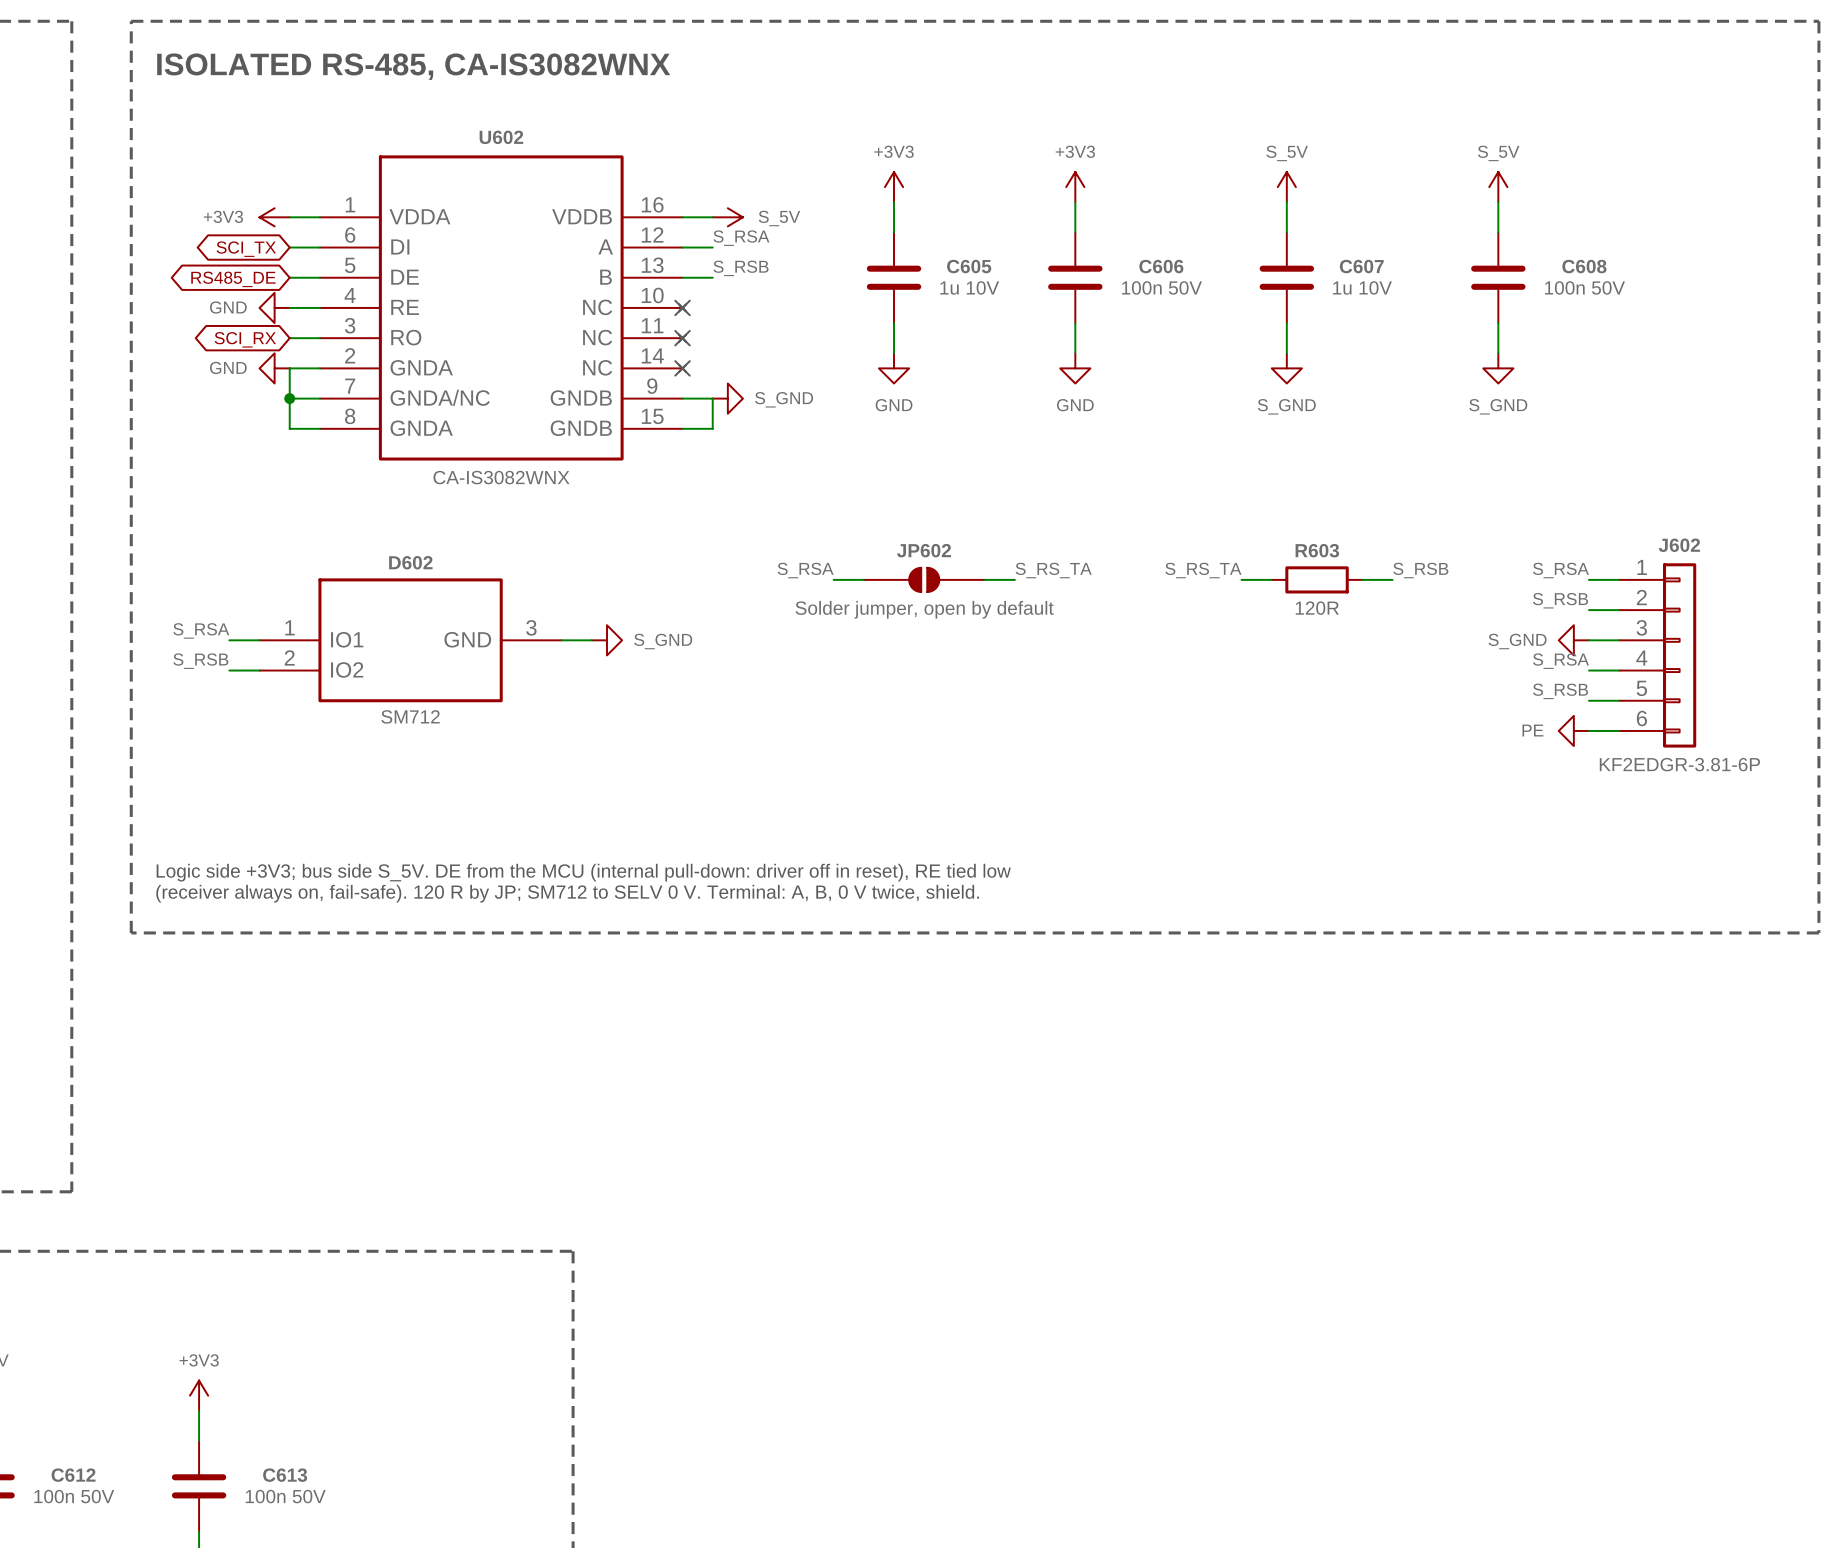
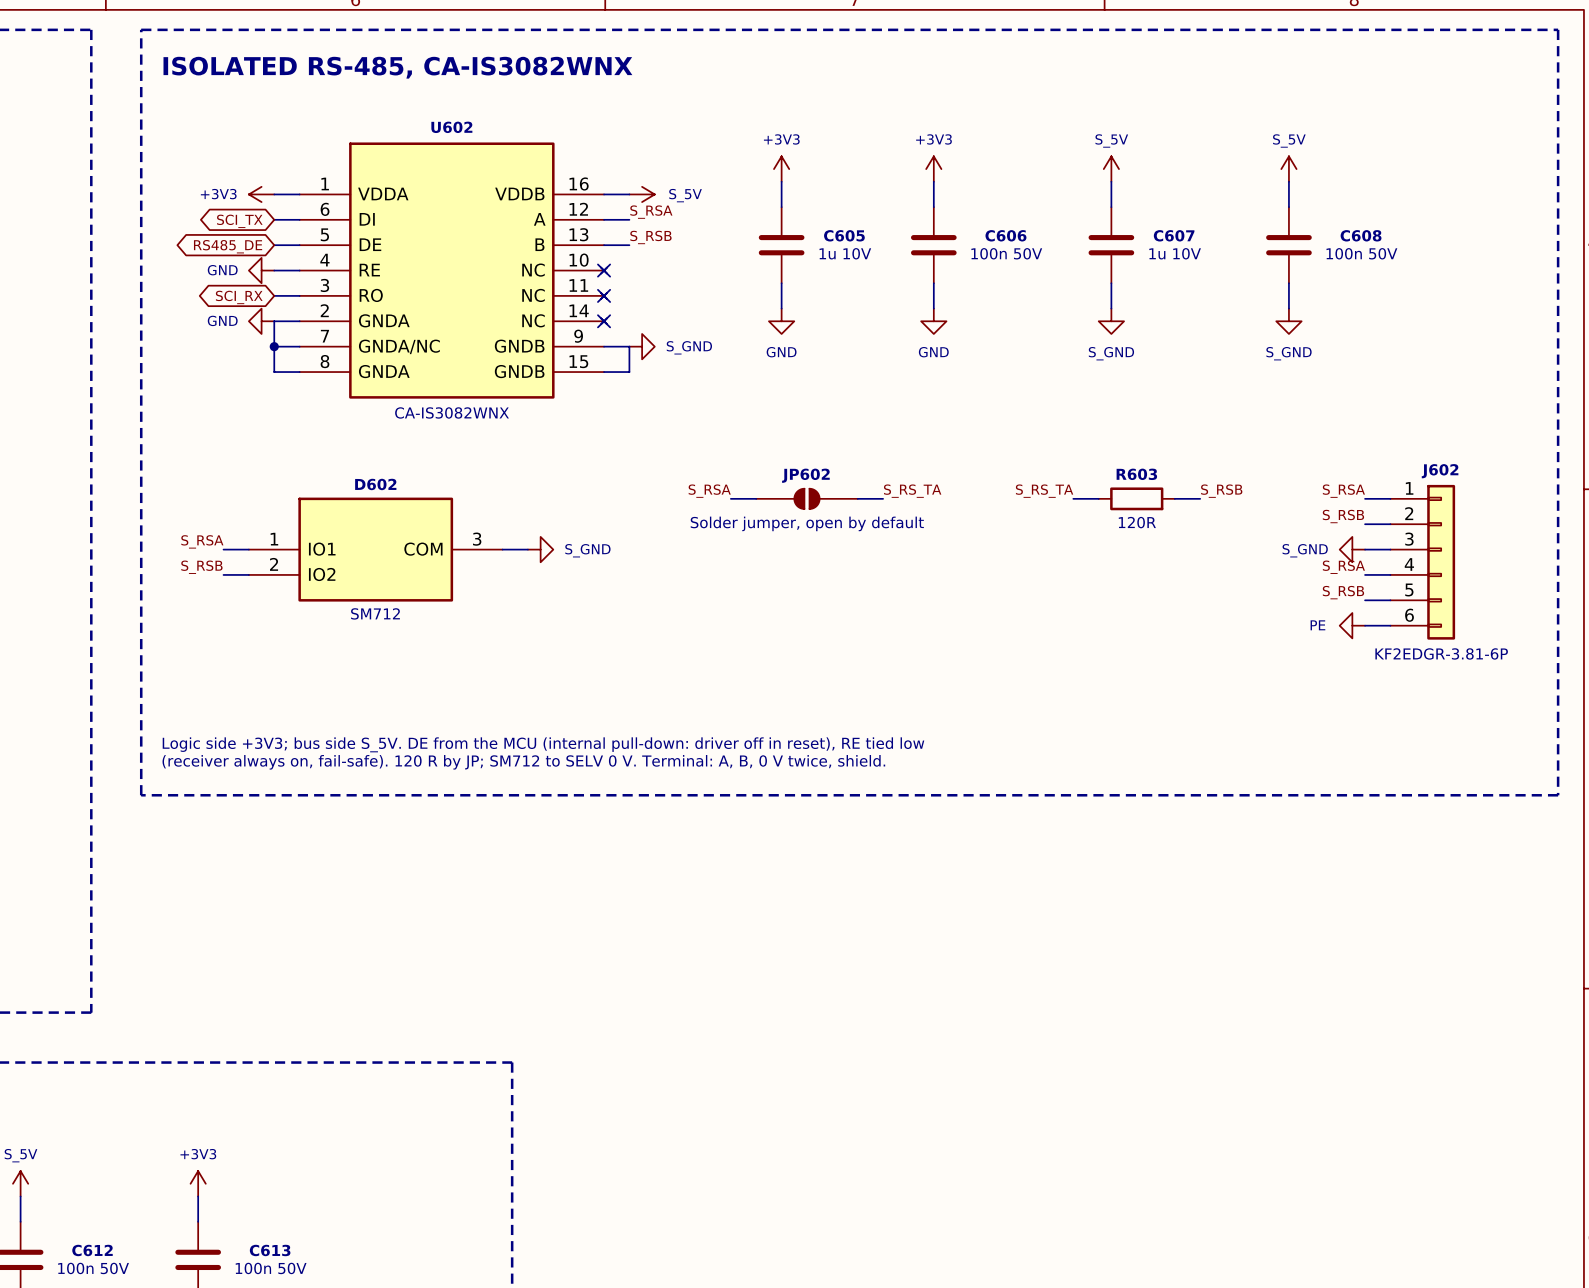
D602 pin name: GND (467, 639) -> COM (423, 549)

